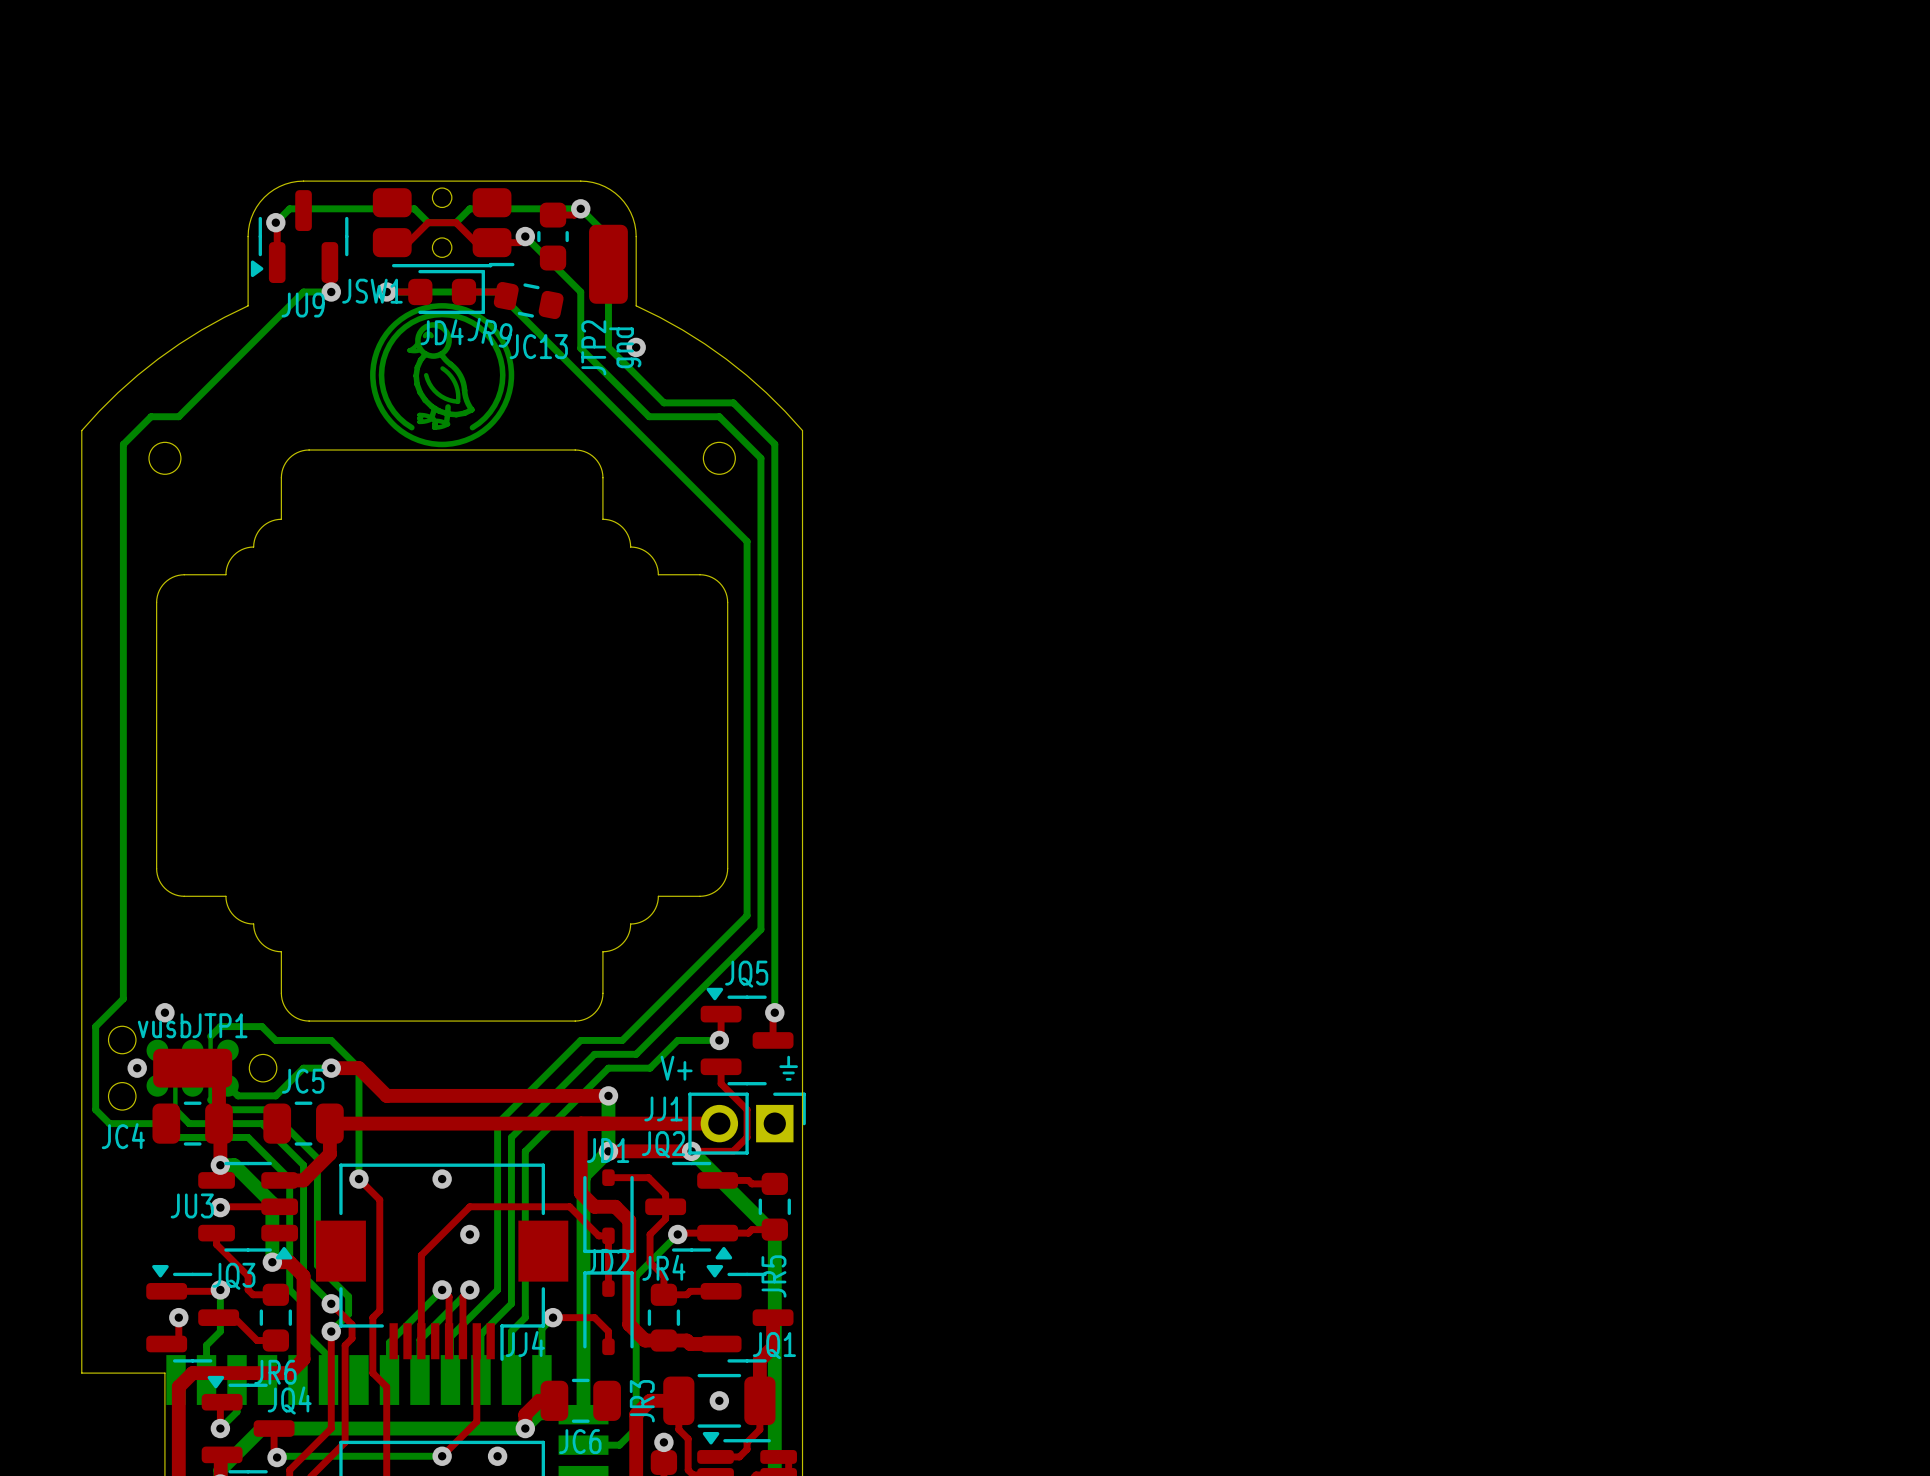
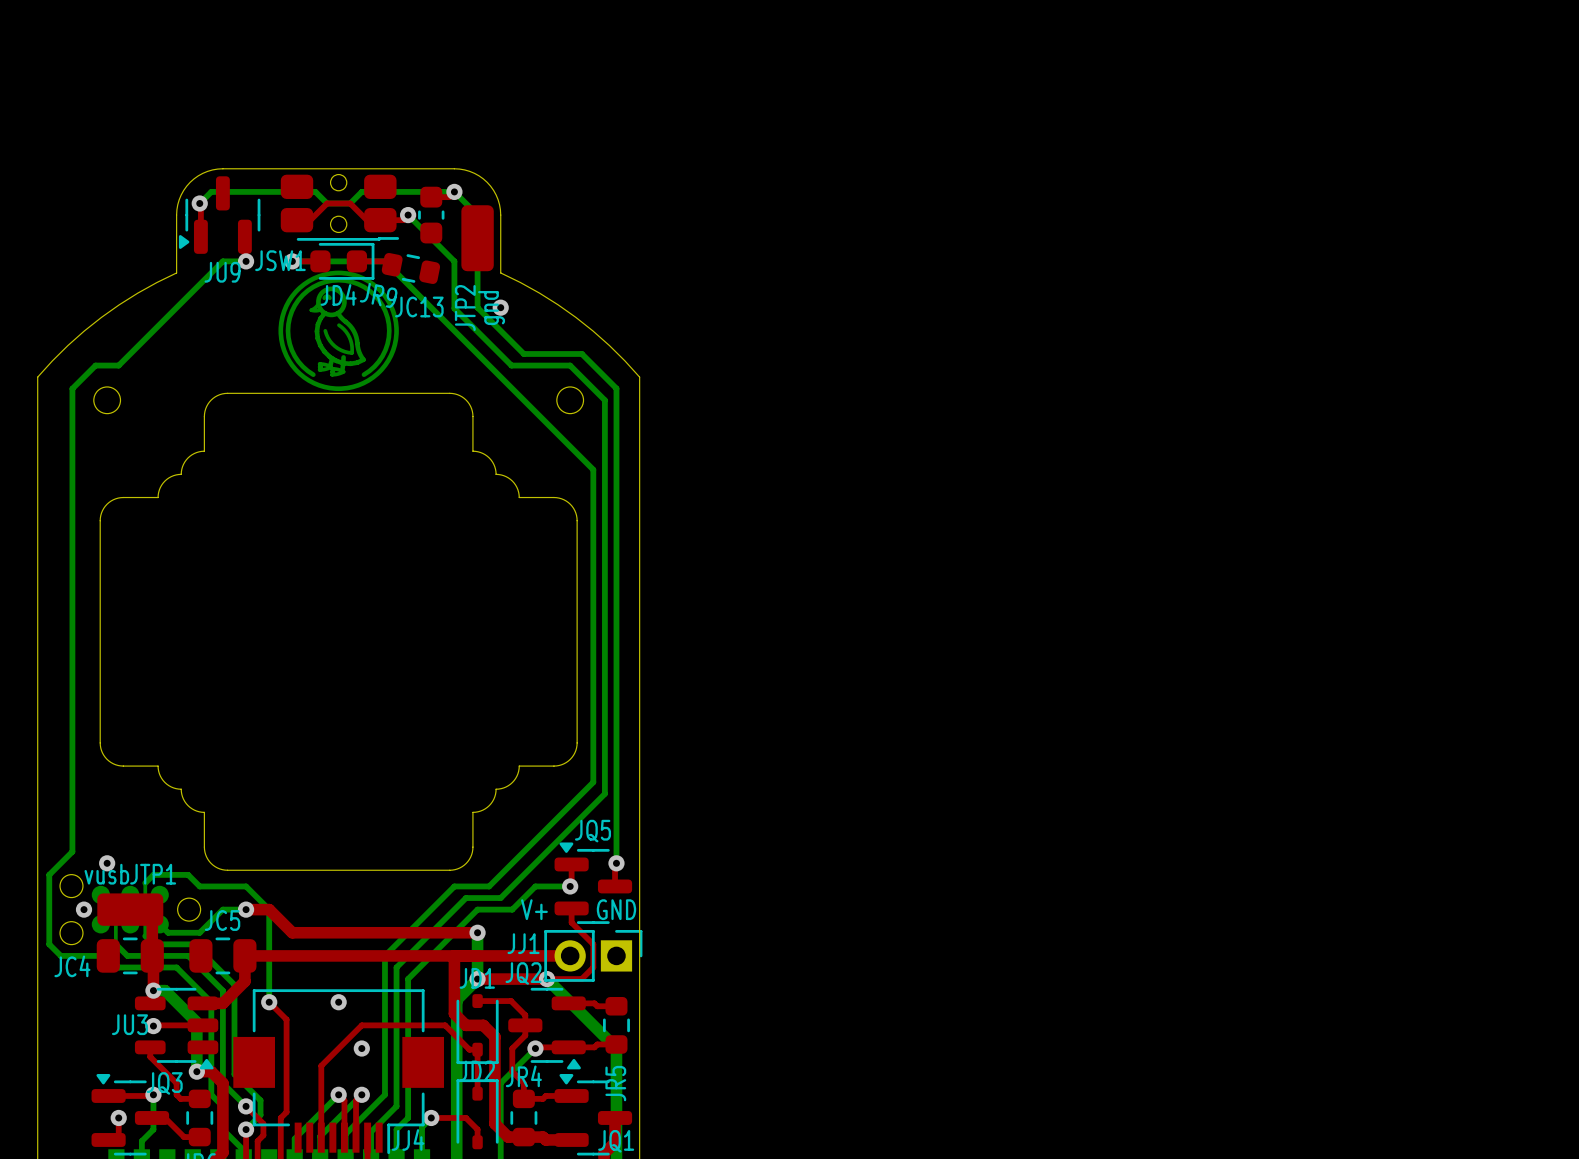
text: ⏚ (788, 1068) -> GND (616, 909)

